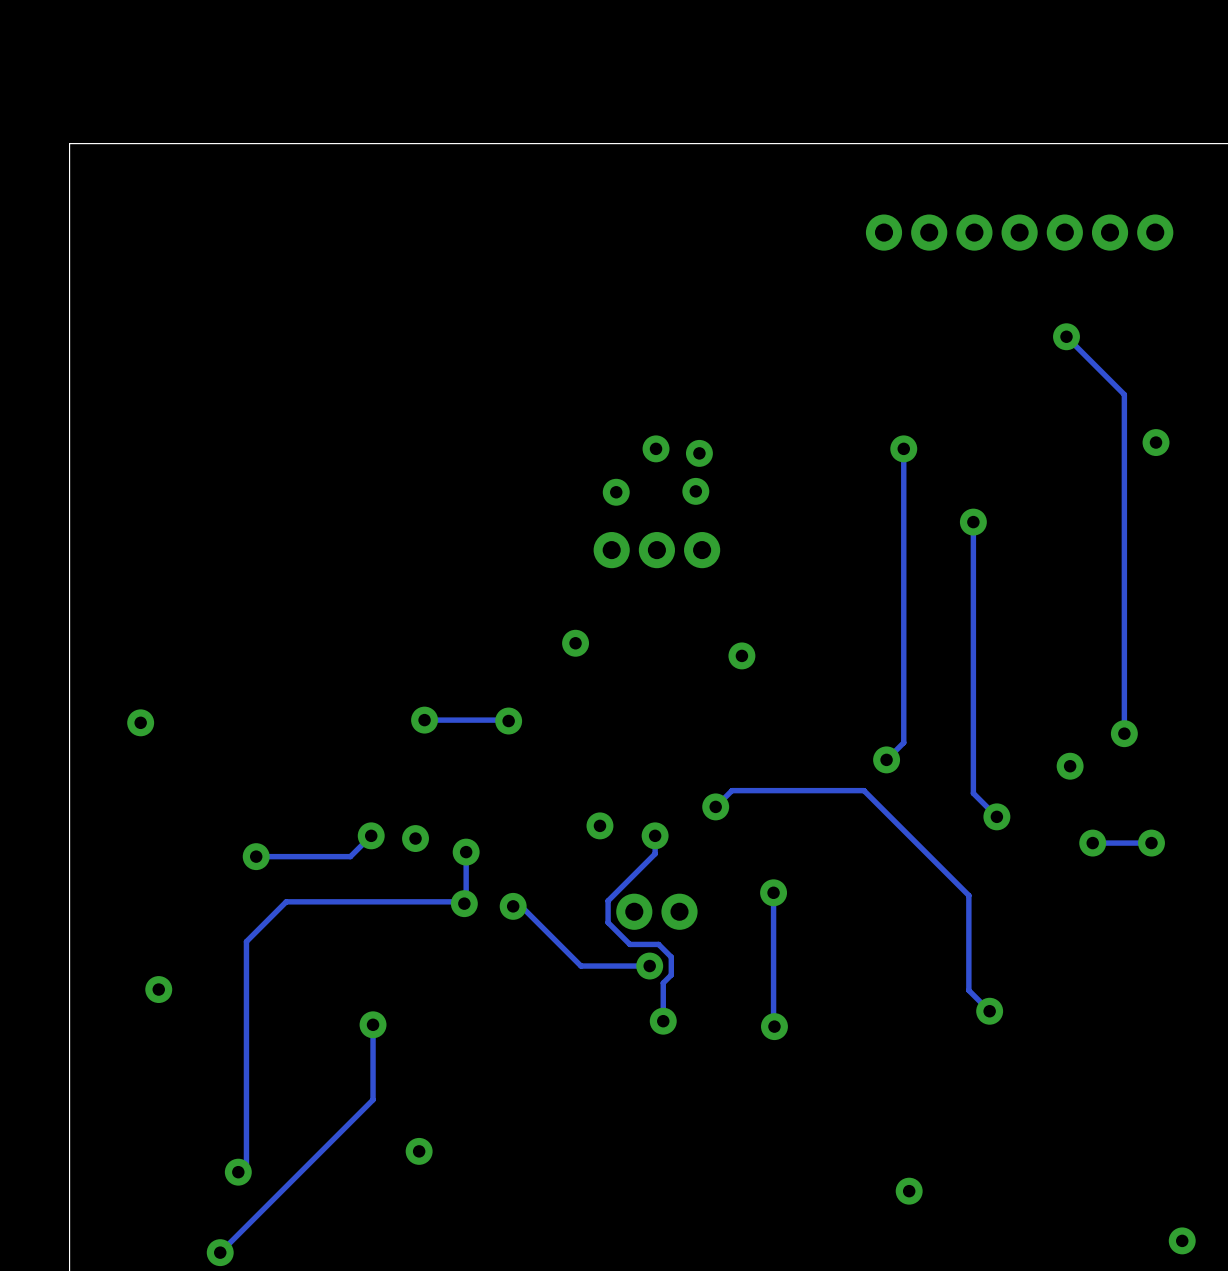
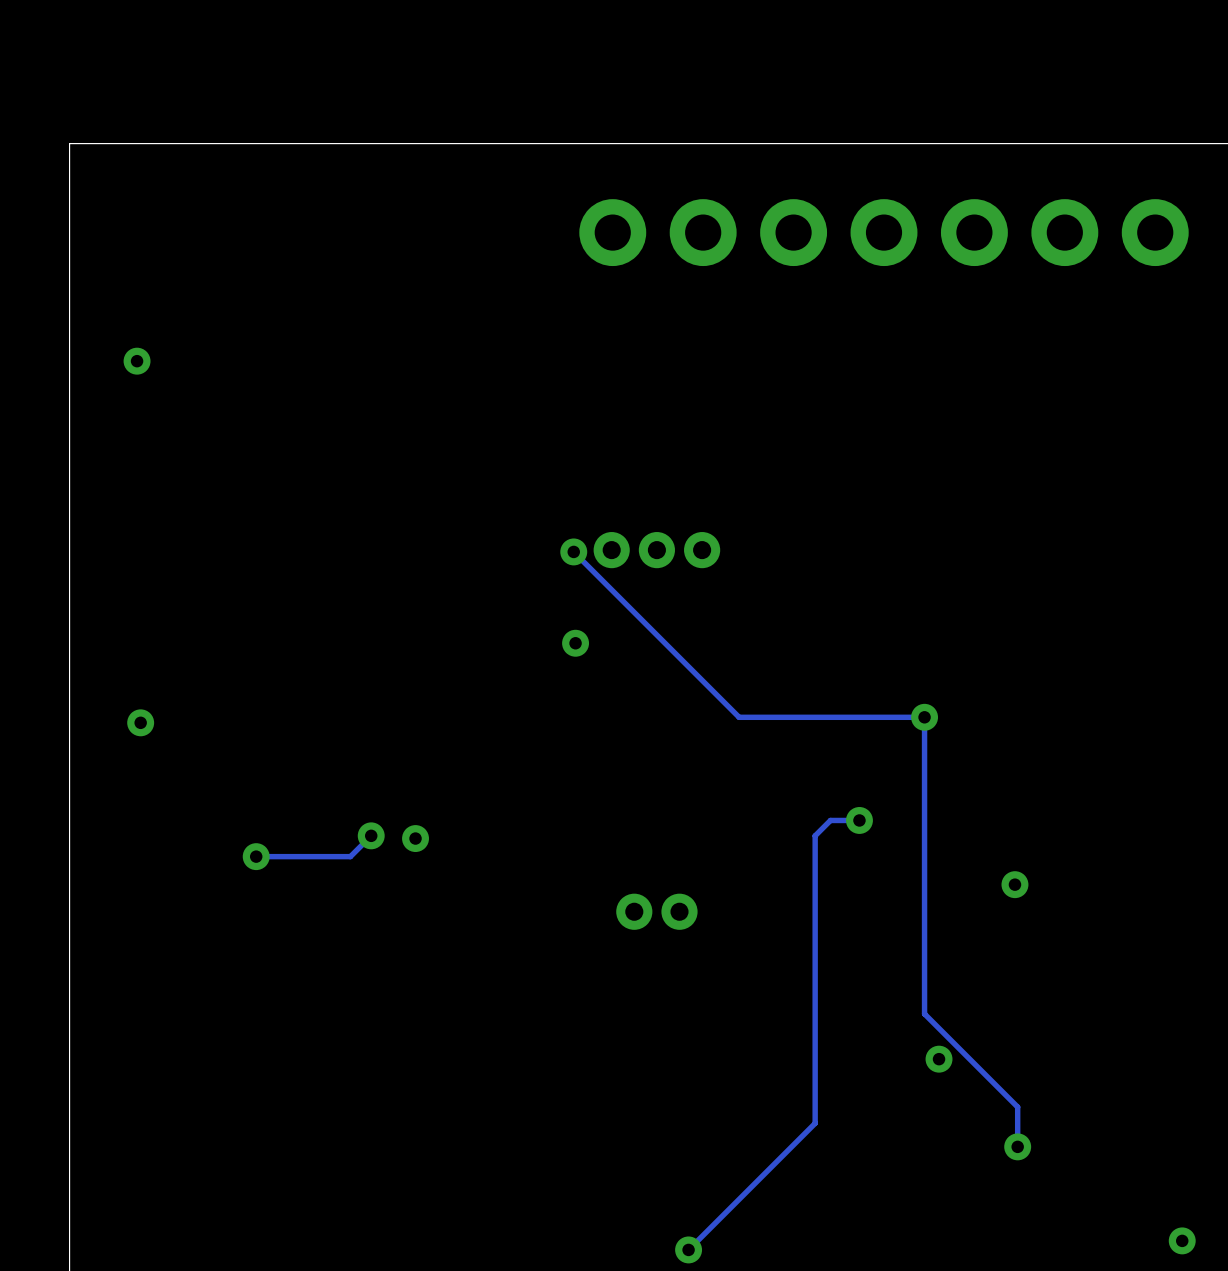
part: none -> (884, 232)
part: (1019, 232) -> none
track: (1066, 336) (1124, 394) (1124, 733) -> none
via: (1066, 336) -> none
via: none -> (137, 361)
via: (1156, 442) -> none
via: (656, 448) -> none
track: (903, 448) (903, 742) (886, 759) -> none
via: (903, 448) -> none
via: (699, 453) -> none
via: (695, 491) -> none
via: (616, 492) -> none
track: (973, 522) (973, 793) (996, 816) -> none
via: (973, 522) -> none
track: none -> (573, 551) (739, 717) (924, 717) (924, 1013) (1017, 1107) (1017, 1146)
via: none -> (573, 551)
via: (741, 655) -> none
via: none -> (924, 717)
track: (424, 720) (508, 721) -> none
via: (424, 720) -> none
via: (508, 721) -> none
via: (1124, 733) -> none
via: (886, 759) -> none
via: (1070, 766) -> none
track: (715, 806) (731, 790) (863, 790) (968, 895) (968, 990) (989, 1011) -> none
via: (715, 806) -> none
via: (996, 816) -> none
track: none -> (859, 820) (830, 820) (815, 835) (815, 1123) (688, 1249)
via: none -> (859, 820)
via: (599, 825) -> none
track: (655, 835) (655, 853) (608, 900) (608, 922) (629, 944) (658, 944) (671, 957) (671, 974) (663, 983) (663, 1021) -> none
via: (655, 835) -> none
via: (1092, 843) -> none
track: (1151, 843) (1092, 843) -> none
via: (1151, 843) -> none
track: (466, 852) (466, 901) -> none
via: (466, 852) -> none
via: none -> (1014, 884)
track: (773, 892) (774, 1026) -> none
via: (773, 892) -> none
track: (466, 901) (286, 901) (246, 941) (246, 1164) (238, 1172) -> none
via: (464, 903) -> none
track: (513, 906) (521, 906) (580, 966) (649, 966) -> none
via: (513, 906) -> none
via: (649, 966) -> none
via: (158, 989) -> none
via: (989, 1011) -> none
via: (663, 1021) -> none
track: (373, 1024) (373, 1099) (220, 1252) -> none
via: (373, 1024) -> none
via: (774, 1026) -> none
via: none -> (939, 1059)
via: none -> (1017, 1146)
via: (419, 1151) -> none
via: (238, 1172) -> none
via: (909, 1191) -> none
via: none -> (688, 1249)
via: (220, 1252) -> none

